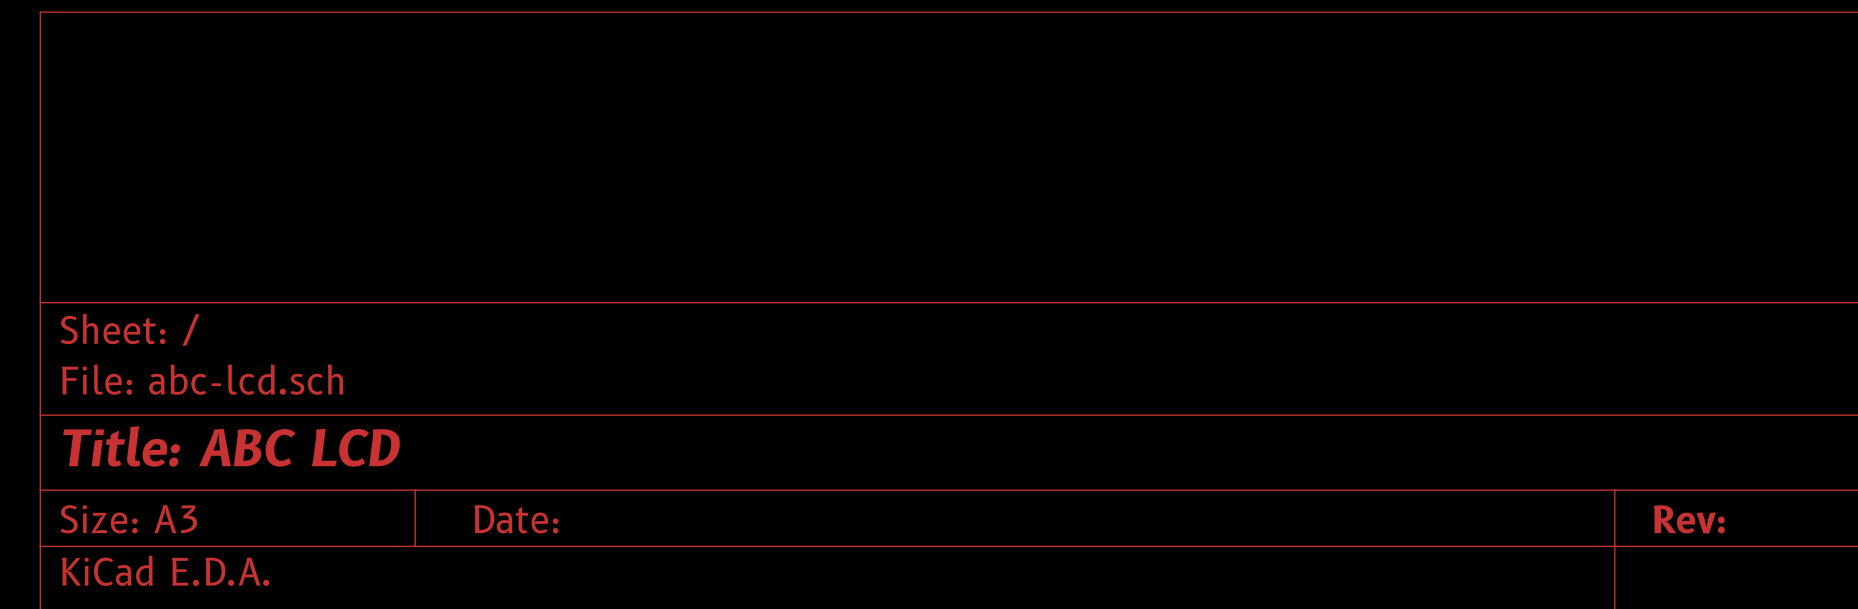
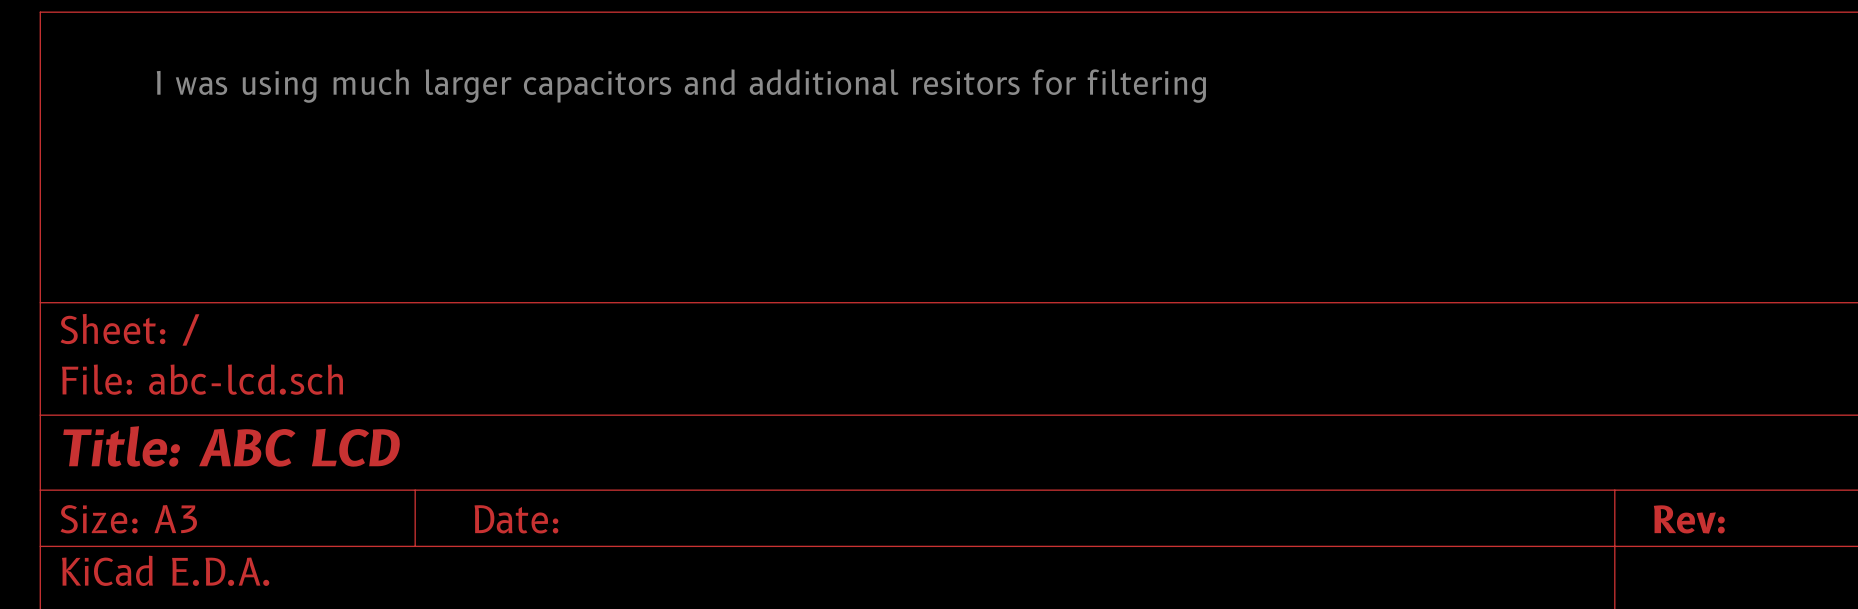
text: none -> I was using much larger capacitors and additional resitors for filtering (681, 86)

